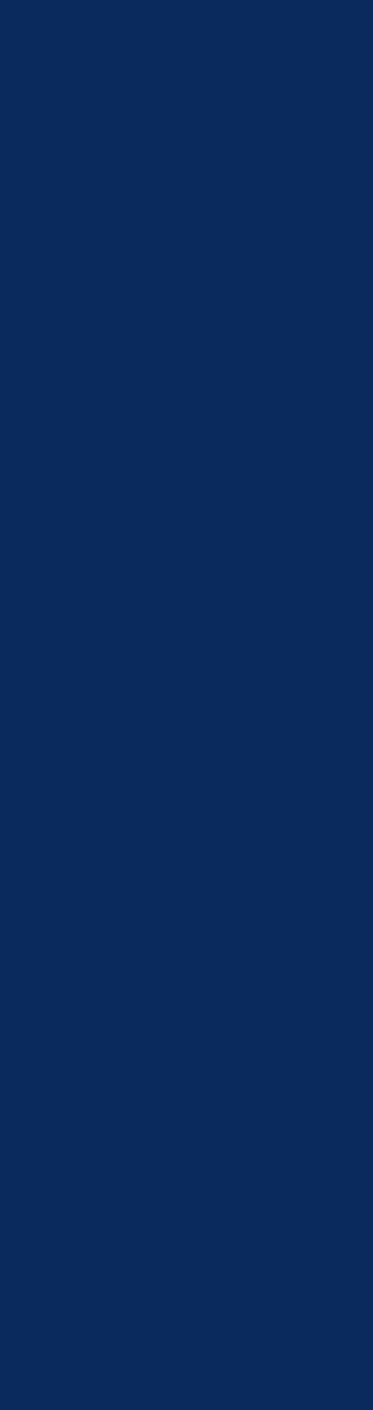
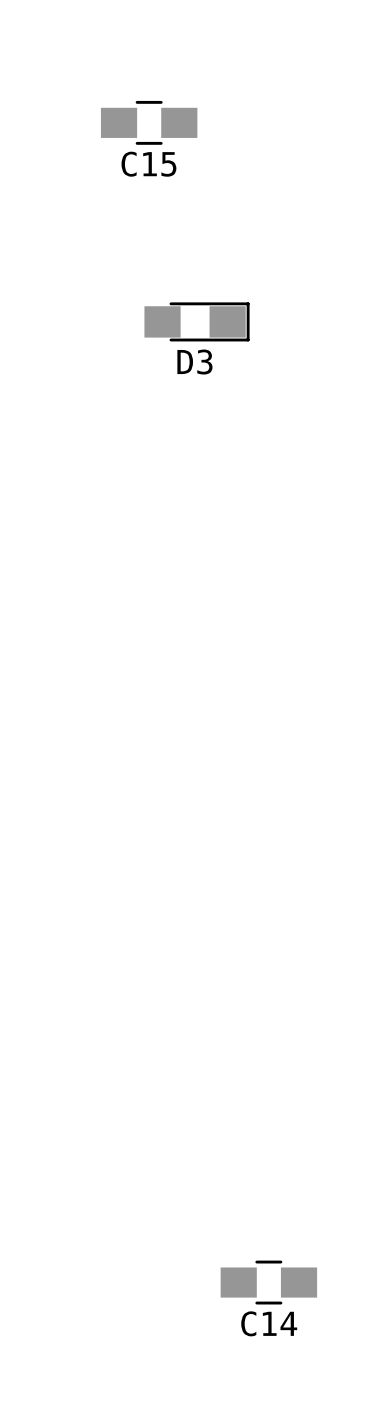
C15: none -> (149, 122)
D3: none -> (197, 321)
C14: none -> (268, 1282)

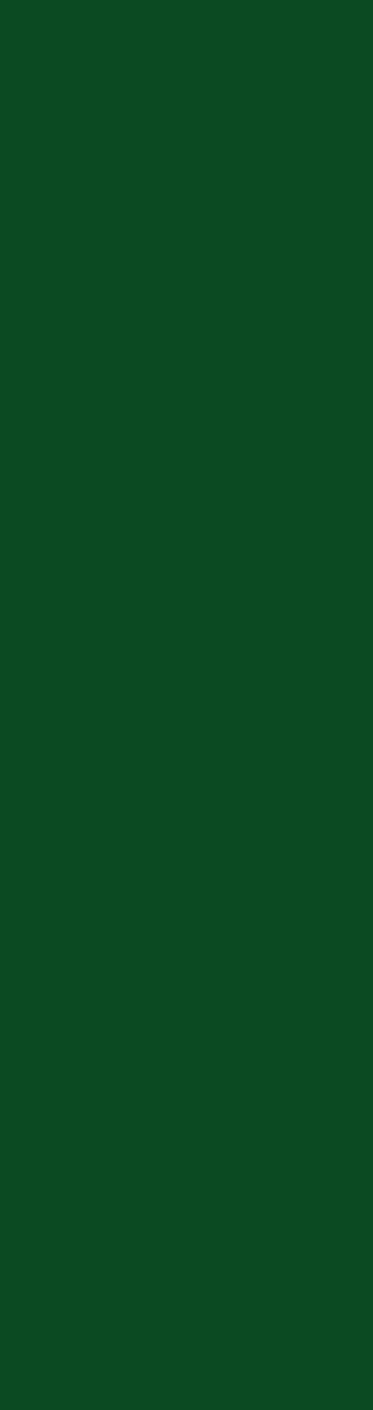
C15: (149, 122) -> none
D3: (197, 321) -> none
C14: (268, 1282) -> none

